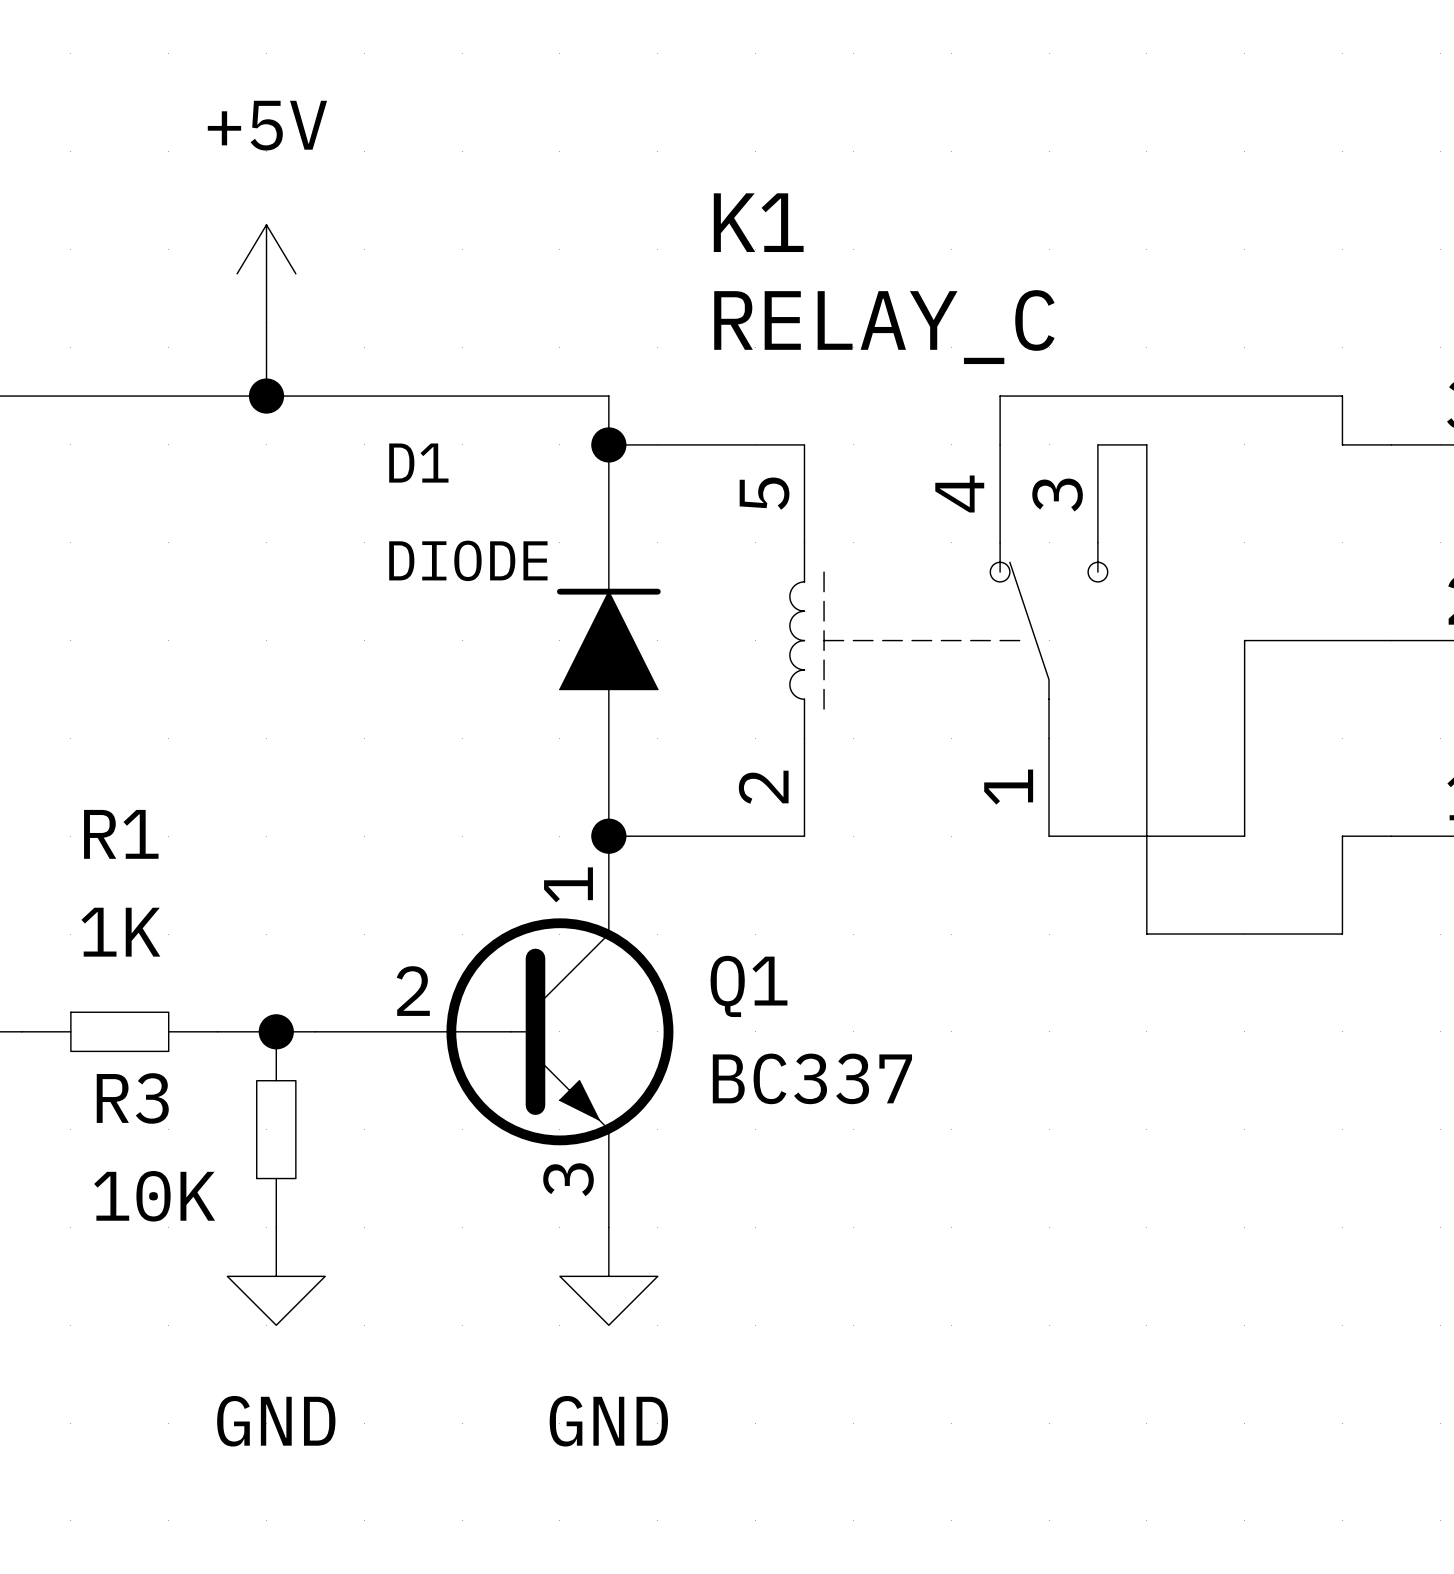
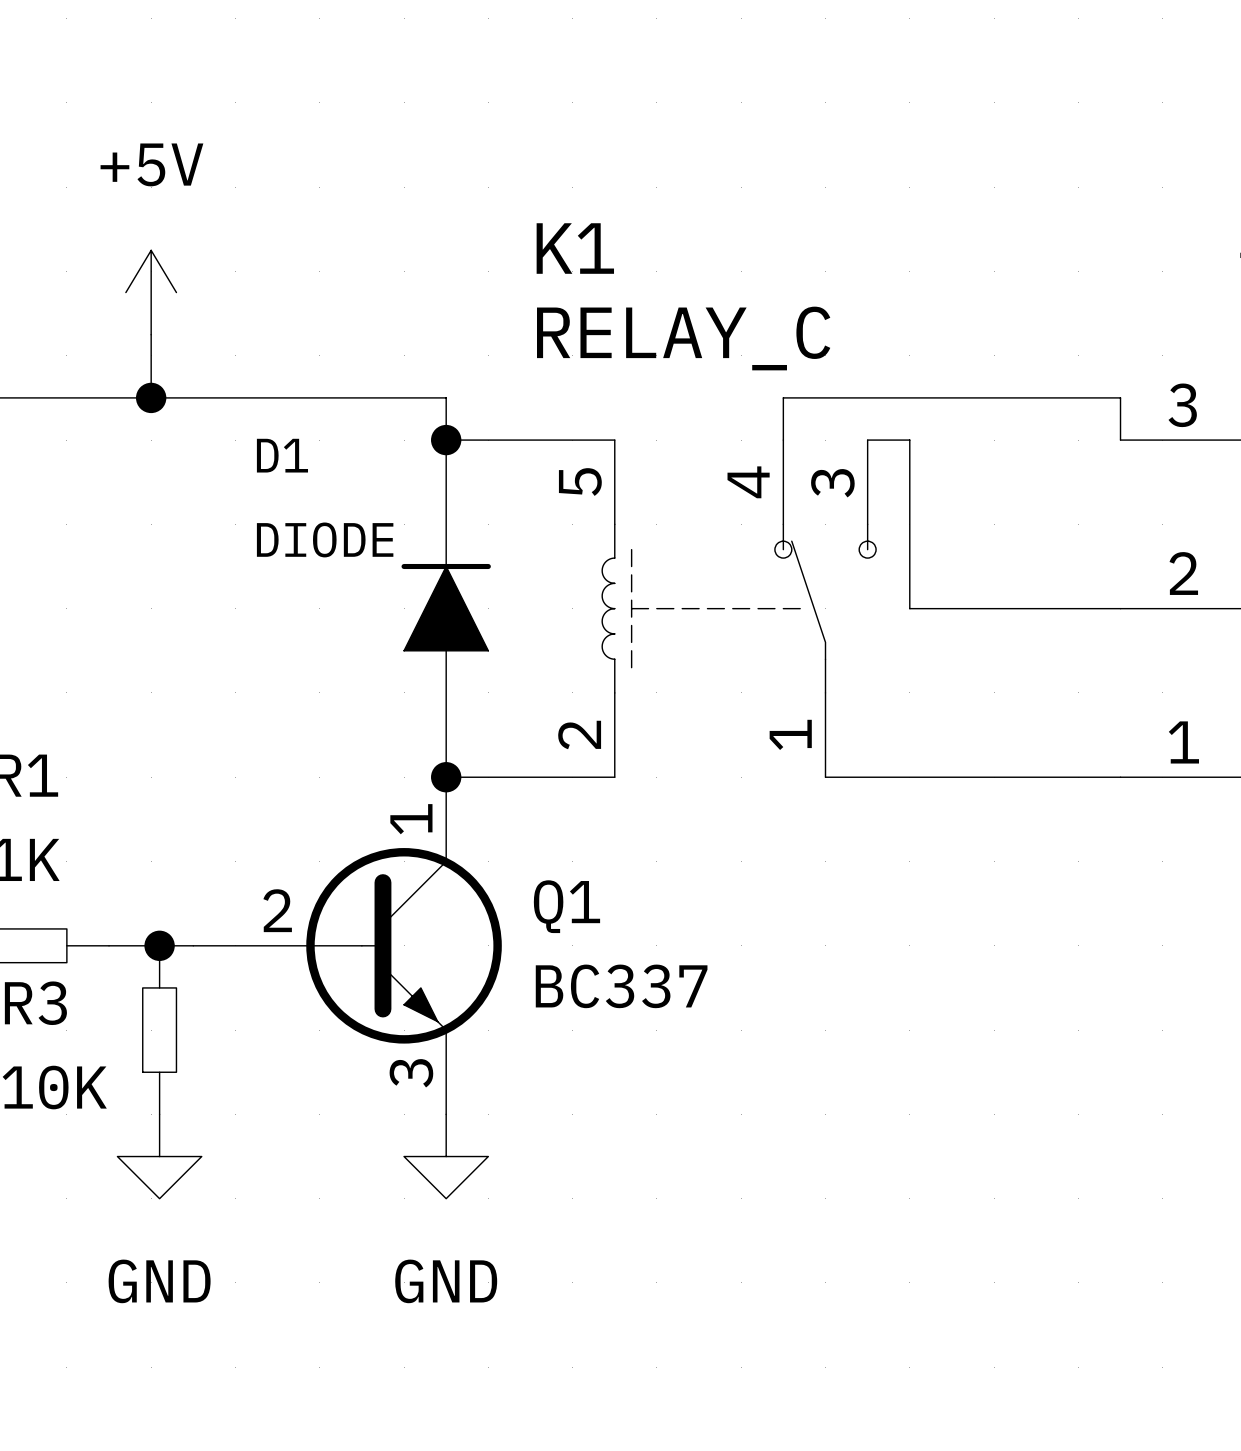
wire: (1342, 396) (1342, 444) (1391, 444) -> (1078, 397) (1120, 397) (1120, 440)
wire: (1146, 640) (1146, 934) (1342, 934) (1342, 836) -> (909, 608) (994, 608)
wire: (1244, 640) (1244, 836) -> (1078, 777) (994, 777)

